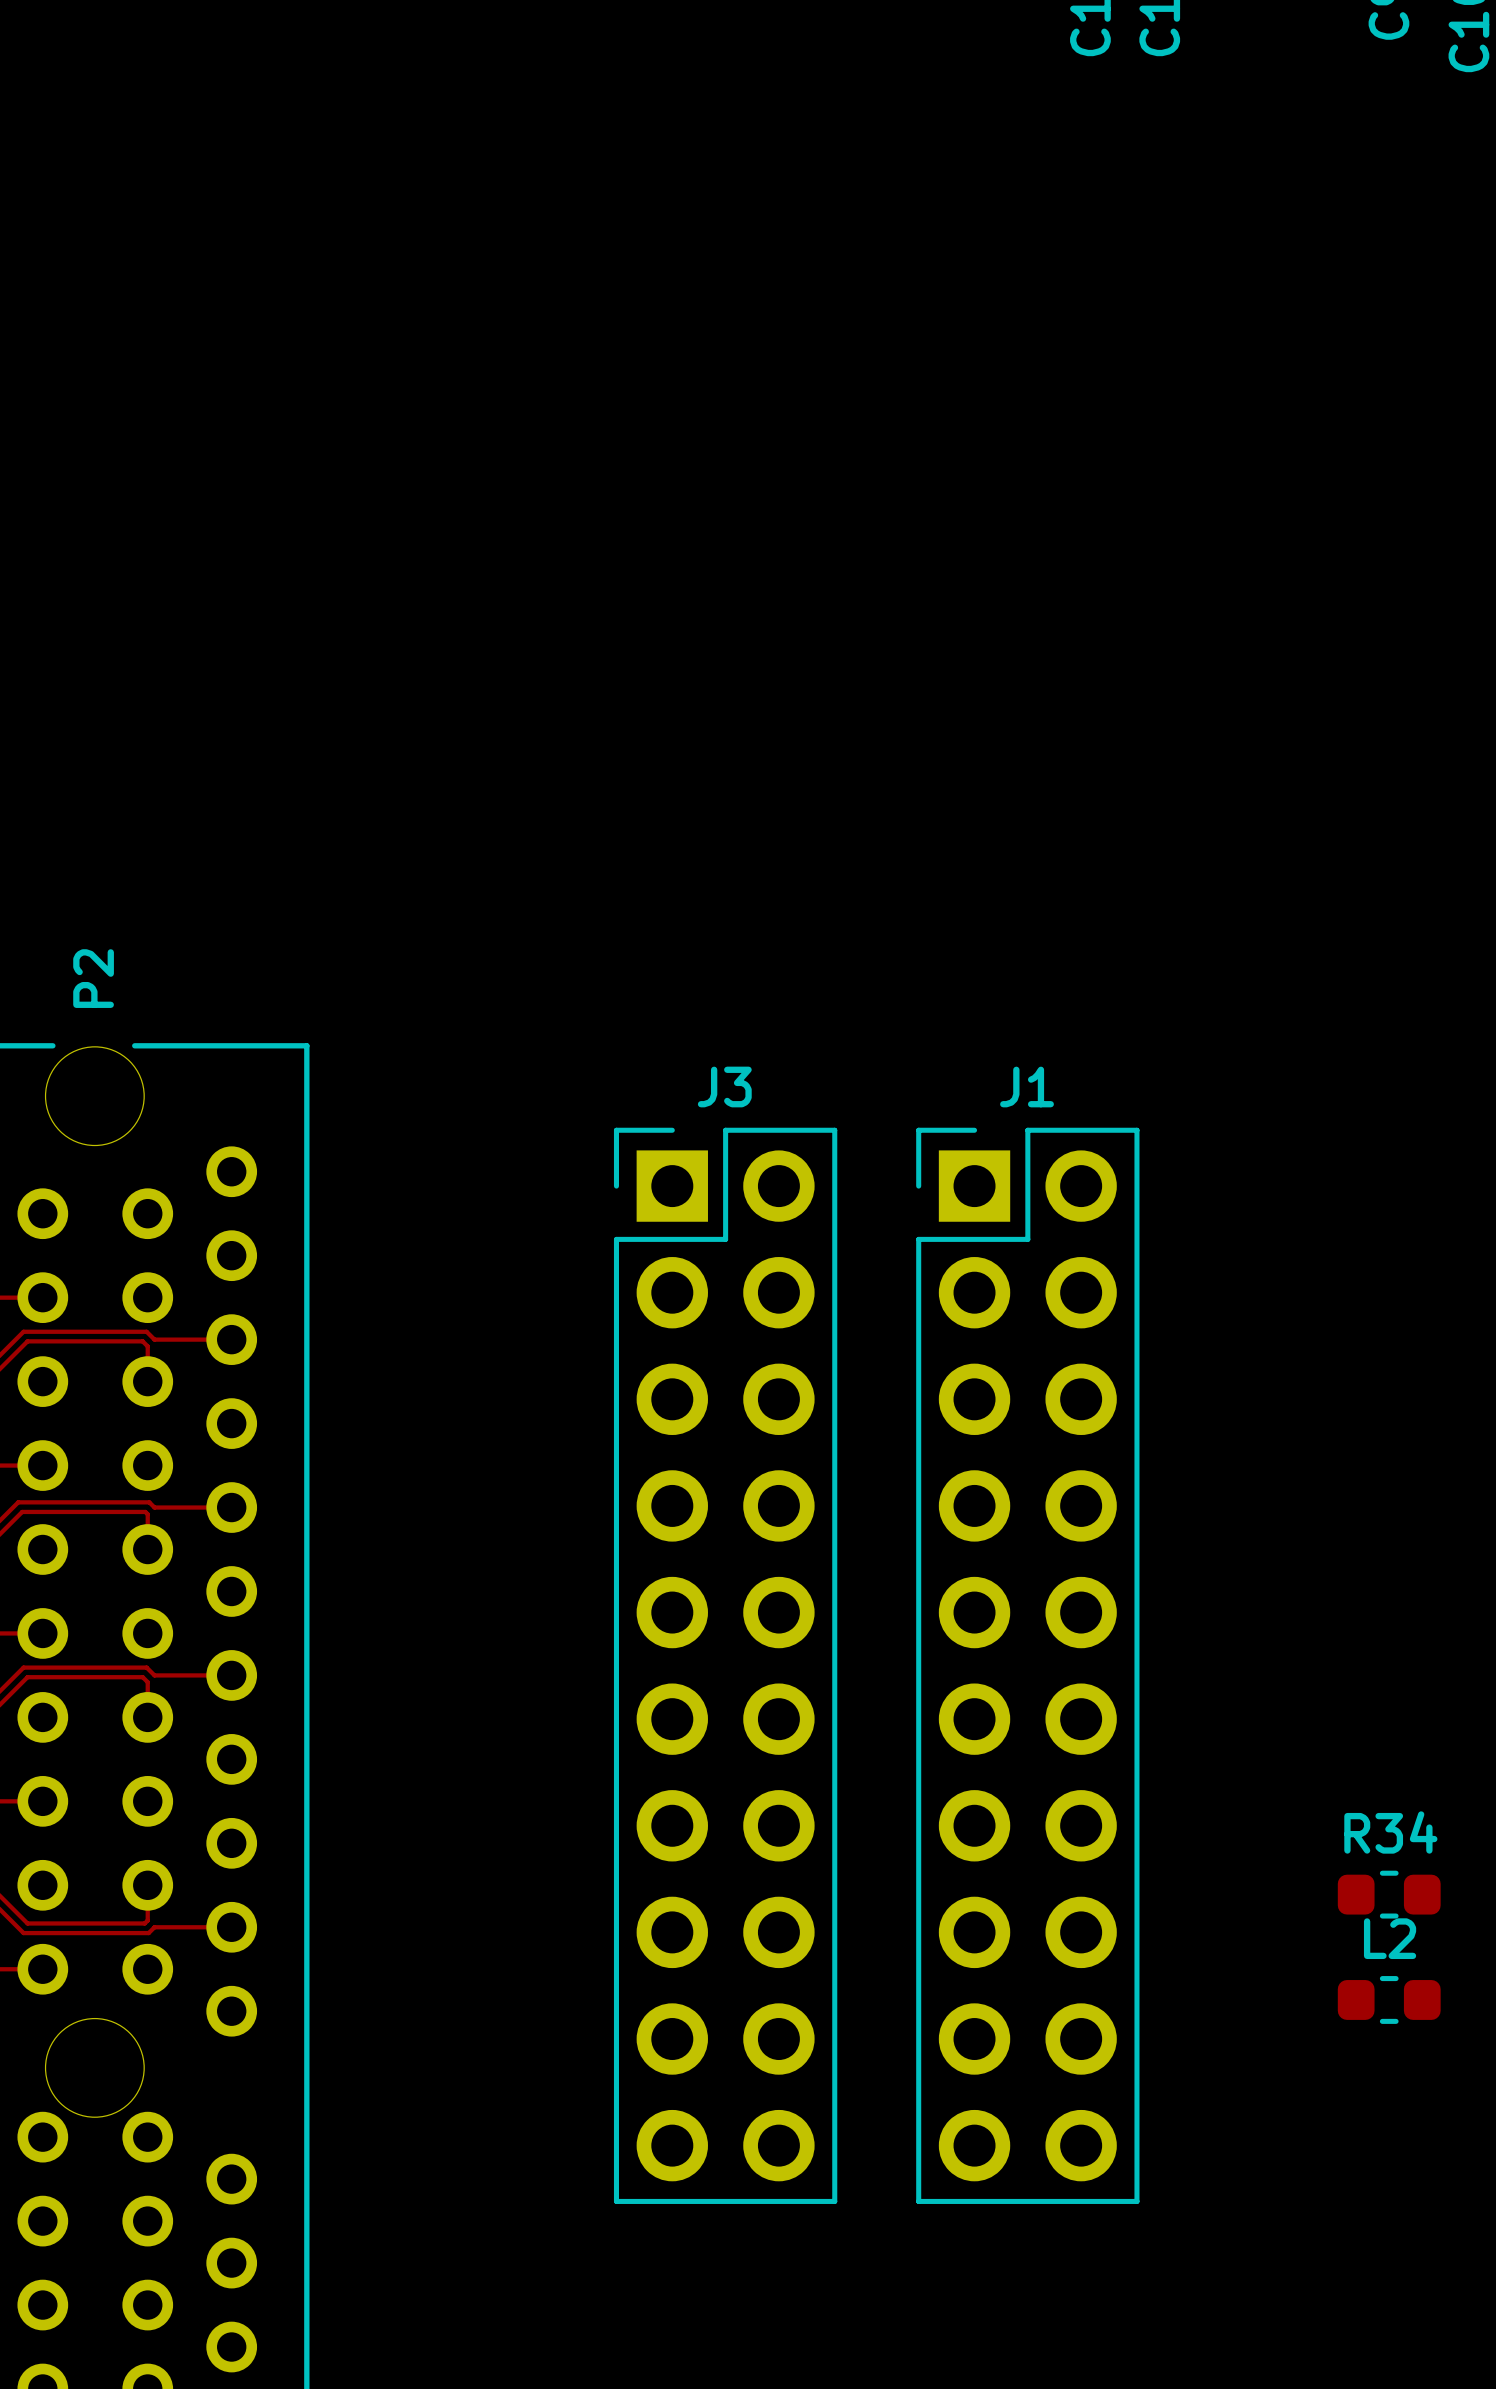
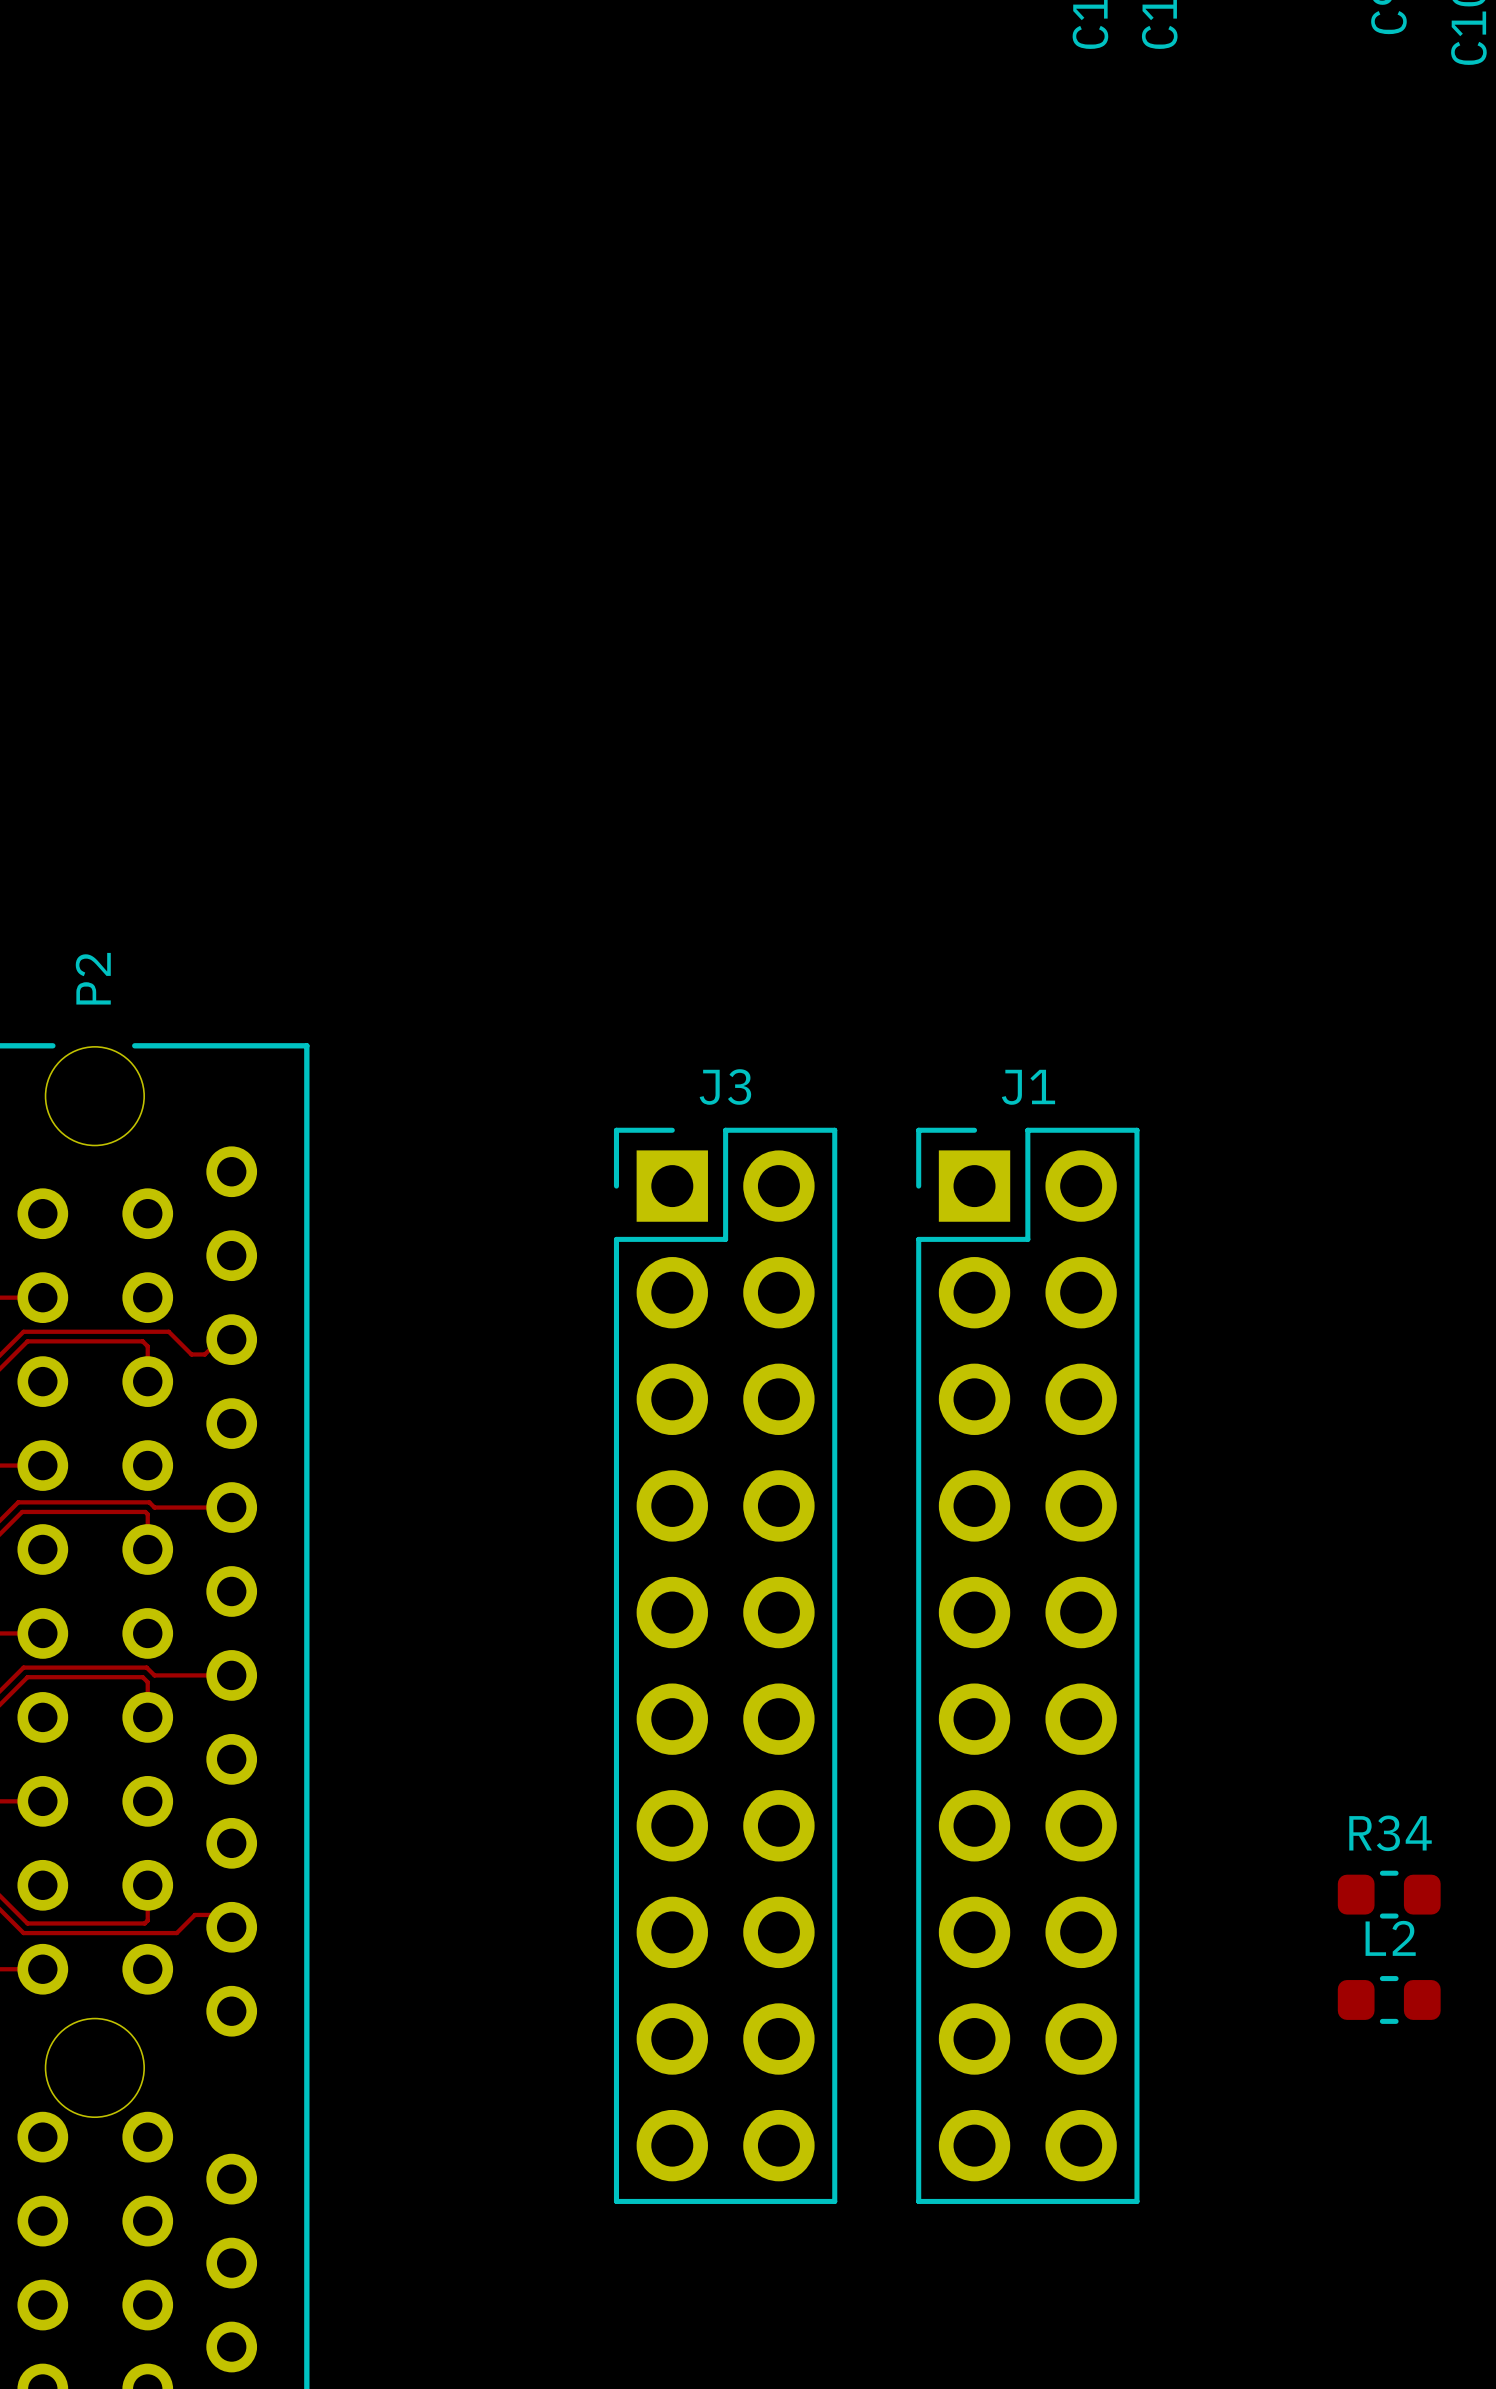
track: (146, 1331) (154, 1339) (219, 1339) -> (146, 1331) (168, 1331) (191, 1354) (204, 1354) (219, 1339)
track: (231, 1927) (154, 1927) (148, 1933) -> (231, 1927) (219, 1914) (194, 1914) (176, 1933) (148, 1933)

